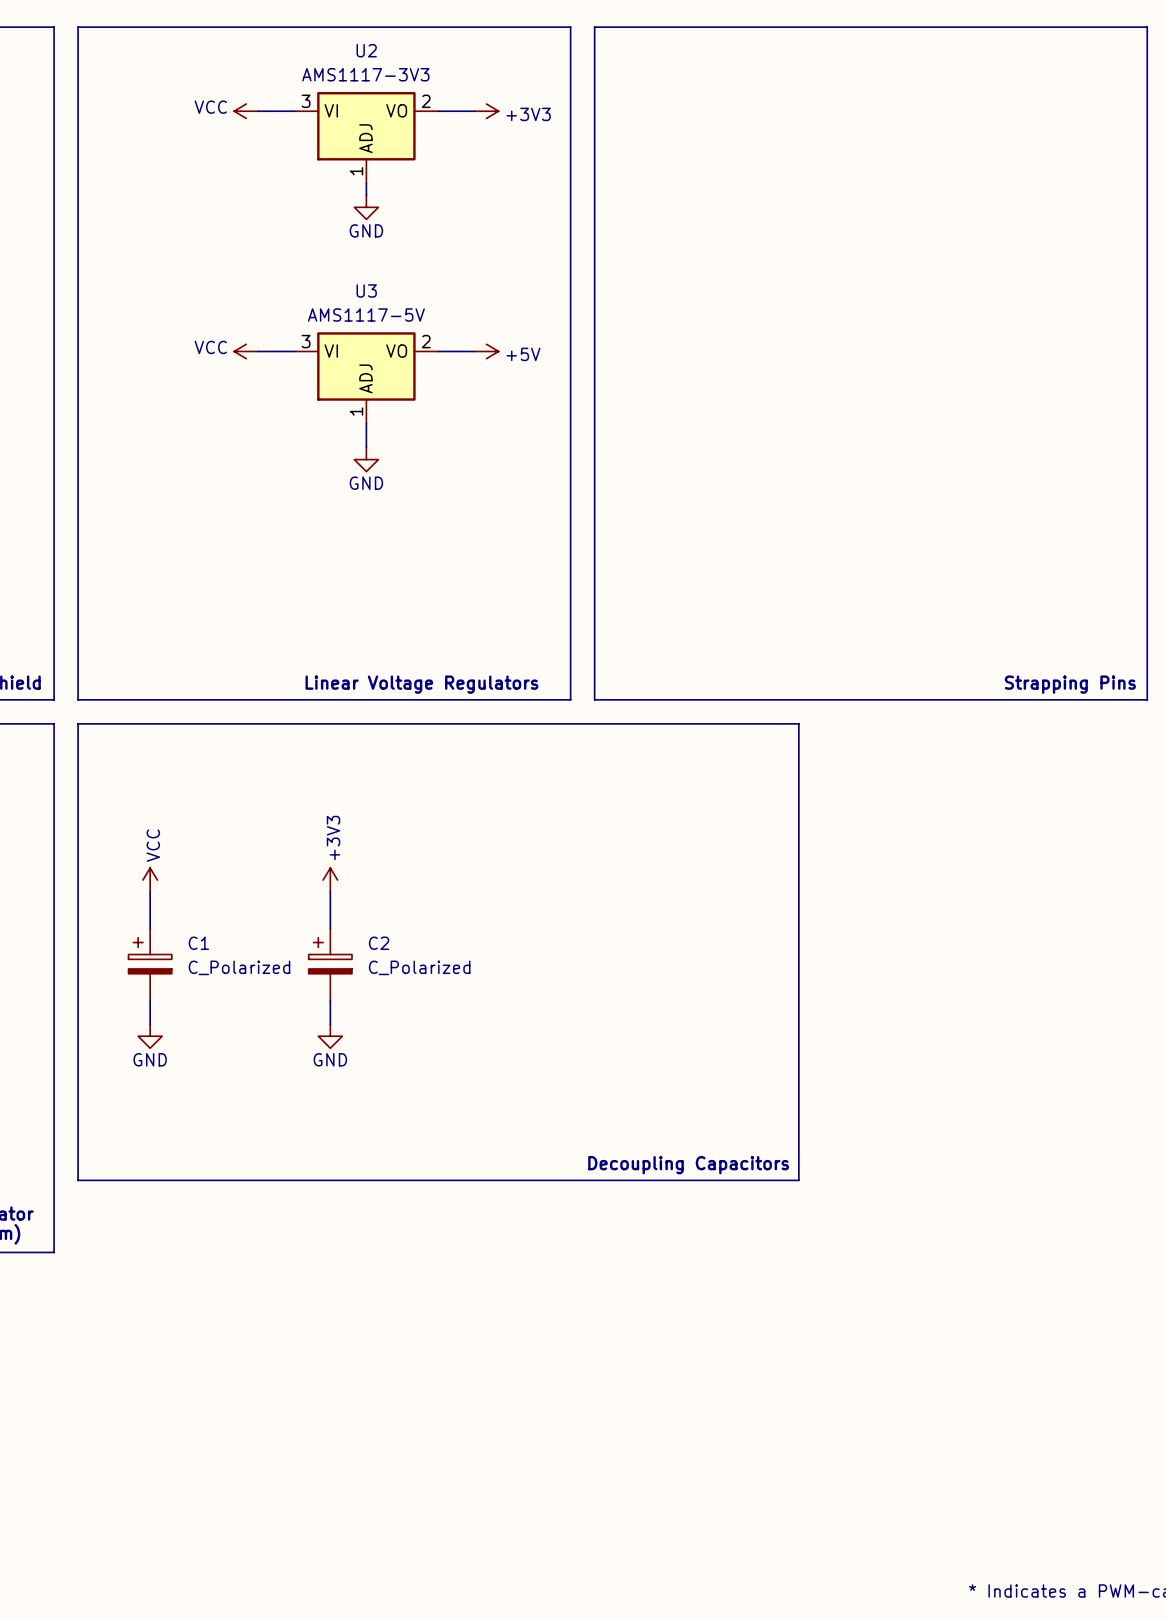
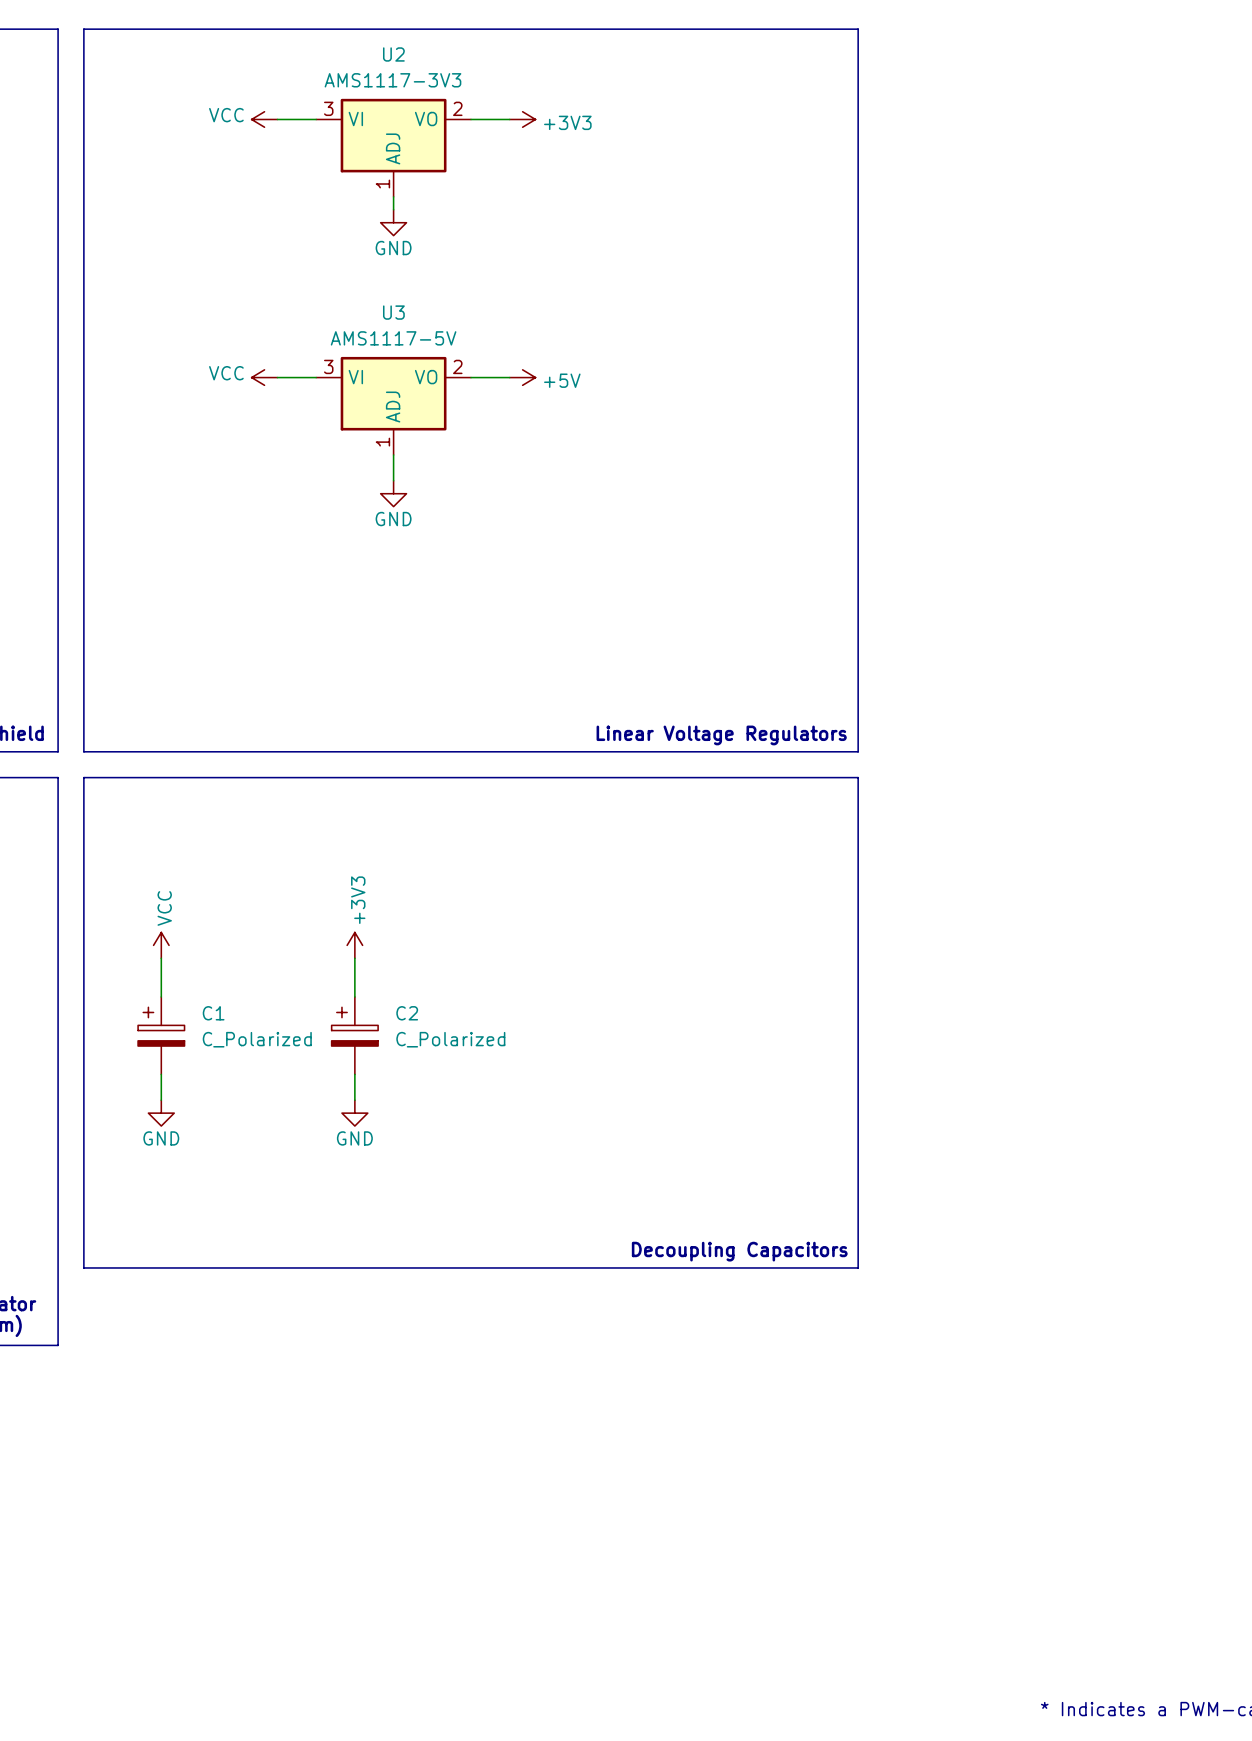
line: (570, 27) (570, 699) -> (612, 29) (638, 29)
line: (594, 27) (594, 699) -> (612, 751) (638, 751)
line: (798, 27) (1147, 27) (1147, 699) (798, 699) -> (858, 29) (858, 751)
text: Linear Voltage Regulators (421, 684) -> none
text: none -> Linear Voltage Regulators (721, 735)
text: Strapping Pins (1070, 684) -> none

